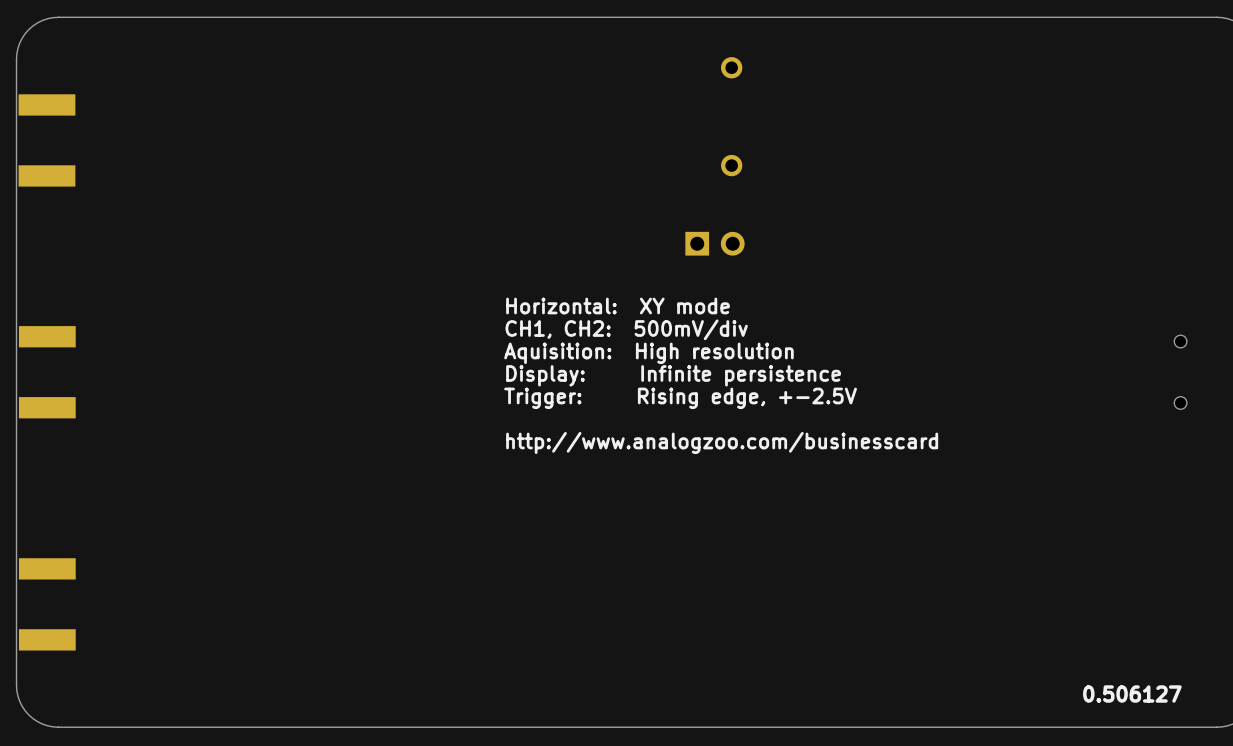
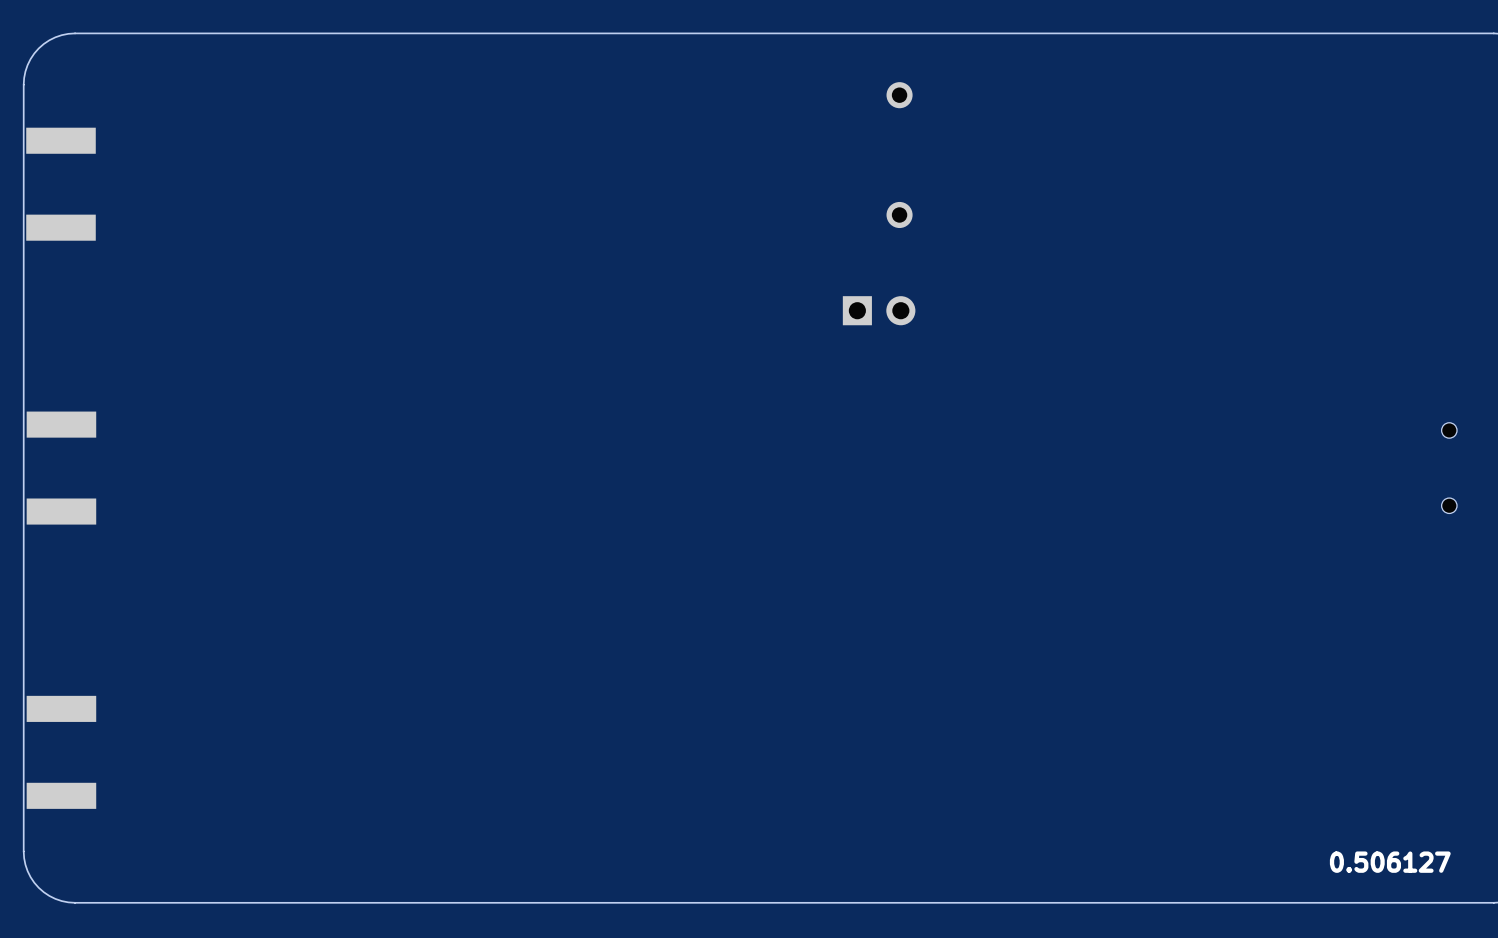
text: Horizontal: XY mode (618, 305) -> none
text: CH1, CH2: 500mV/div (626, 329) -> none
text: Aquisition: High resolution (648, 353) -> none
text: Display: Infinite persistence (673, 375) -> none
text: Trigger: Rising edge, +-2.5V (680, 398) -> none
text: http://www.analogzoo.com/businesscard (722, 442) -> none

